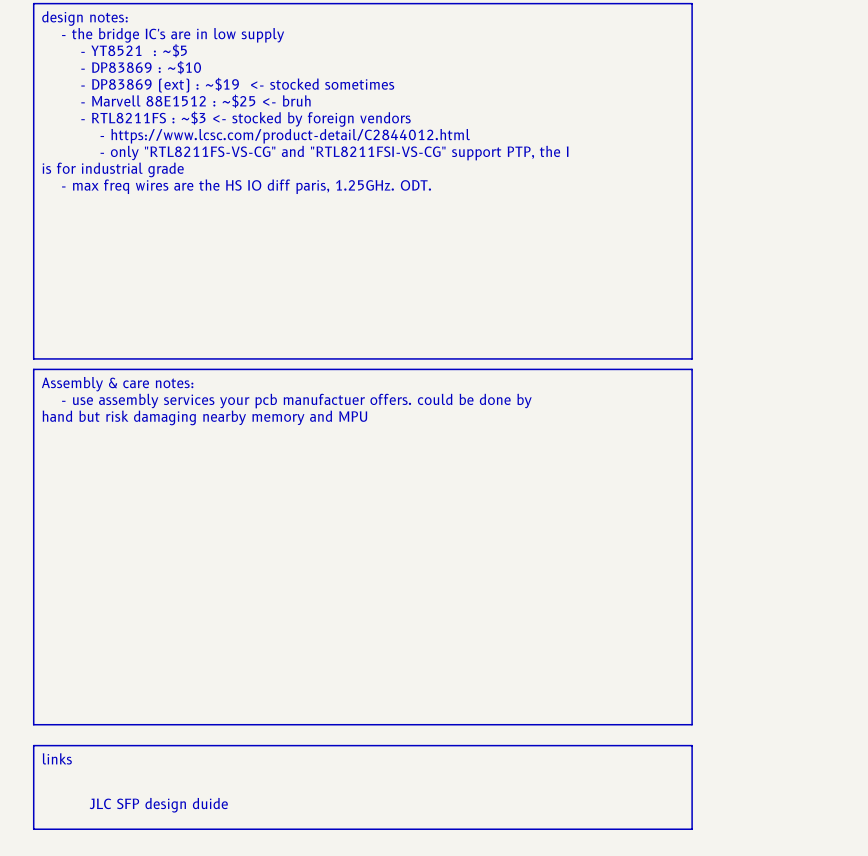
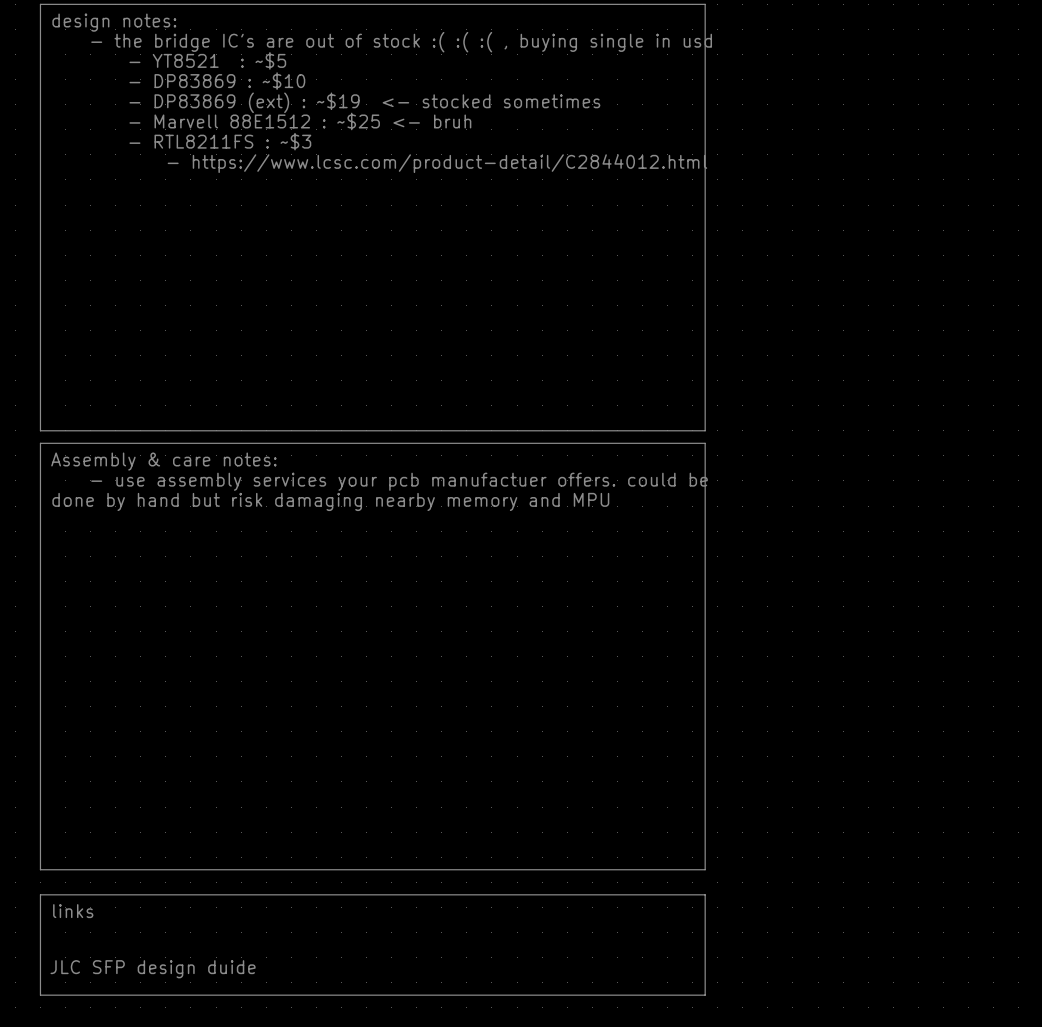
line: (587, 3) (692, 3) (692, 358) (587, 358) -> (705, 4) (705, 430)
text: - the bridge IC's are in low supply (173, 35) -> - the bridge IC's are out of stock :( :( :( , buying single in usd (401, 42)
text: - RTL8211FS : ~$3 <- stocked by foreign vendors (246, 119) -> - RTL8211FS : ~$3 (220, 141)
text: - only "RTL8211FS-VS-CG" and "RTL8211FSI-VS-CG" support PTP, the I (334, 153) -> none
text: is for industrial grade (113, 169) -> none
text: - max freq wires are the HS IO diff paris, 1.25GHz. ODT. (246, 186) -> none
line: (587, 369) (692, 369) (692, 724) (587, 724) -> (705, 443) (705, 869)
text: - use assembly services your pcb manufactuer offers. could be done by (296, 401) -> - use assembly services your pcb manufactuer offers. could be (399, 481)
text: hand but risk damaging nearby memory and MPU (204, 417) -> done by hand but risk damaging nearby memory and MPU (330, 501)
line: (587, 745) (692, 745) (692, 829) (587, 829) -> (705, 894) (705, 995)
text position: JLC SFP design duide (158, 805) -> JLC SFP design duide (153, 969)

